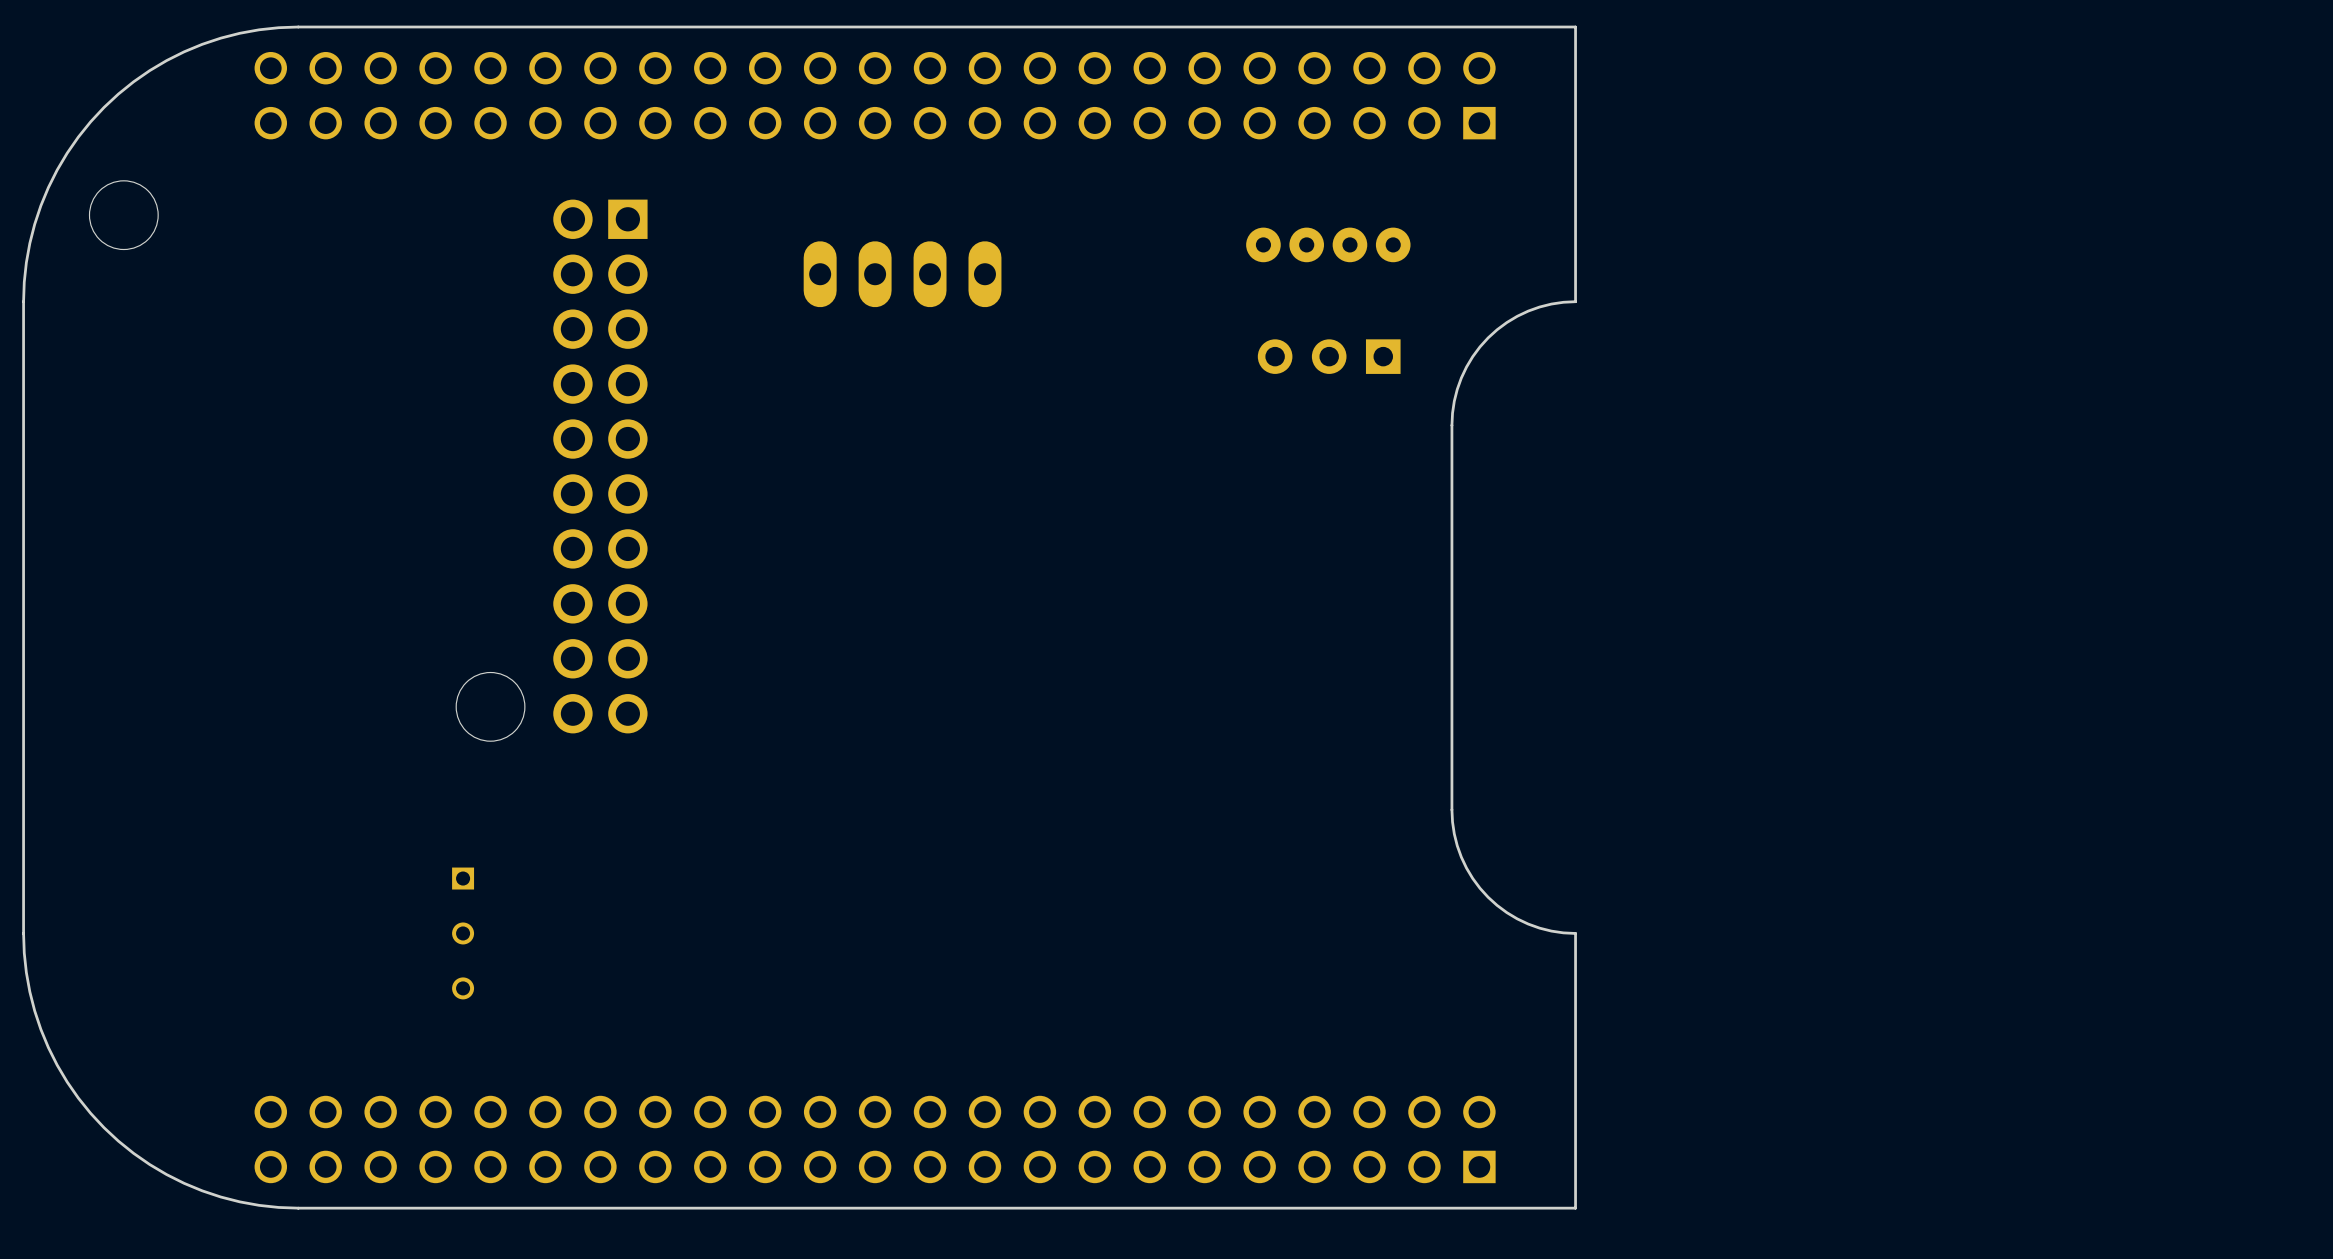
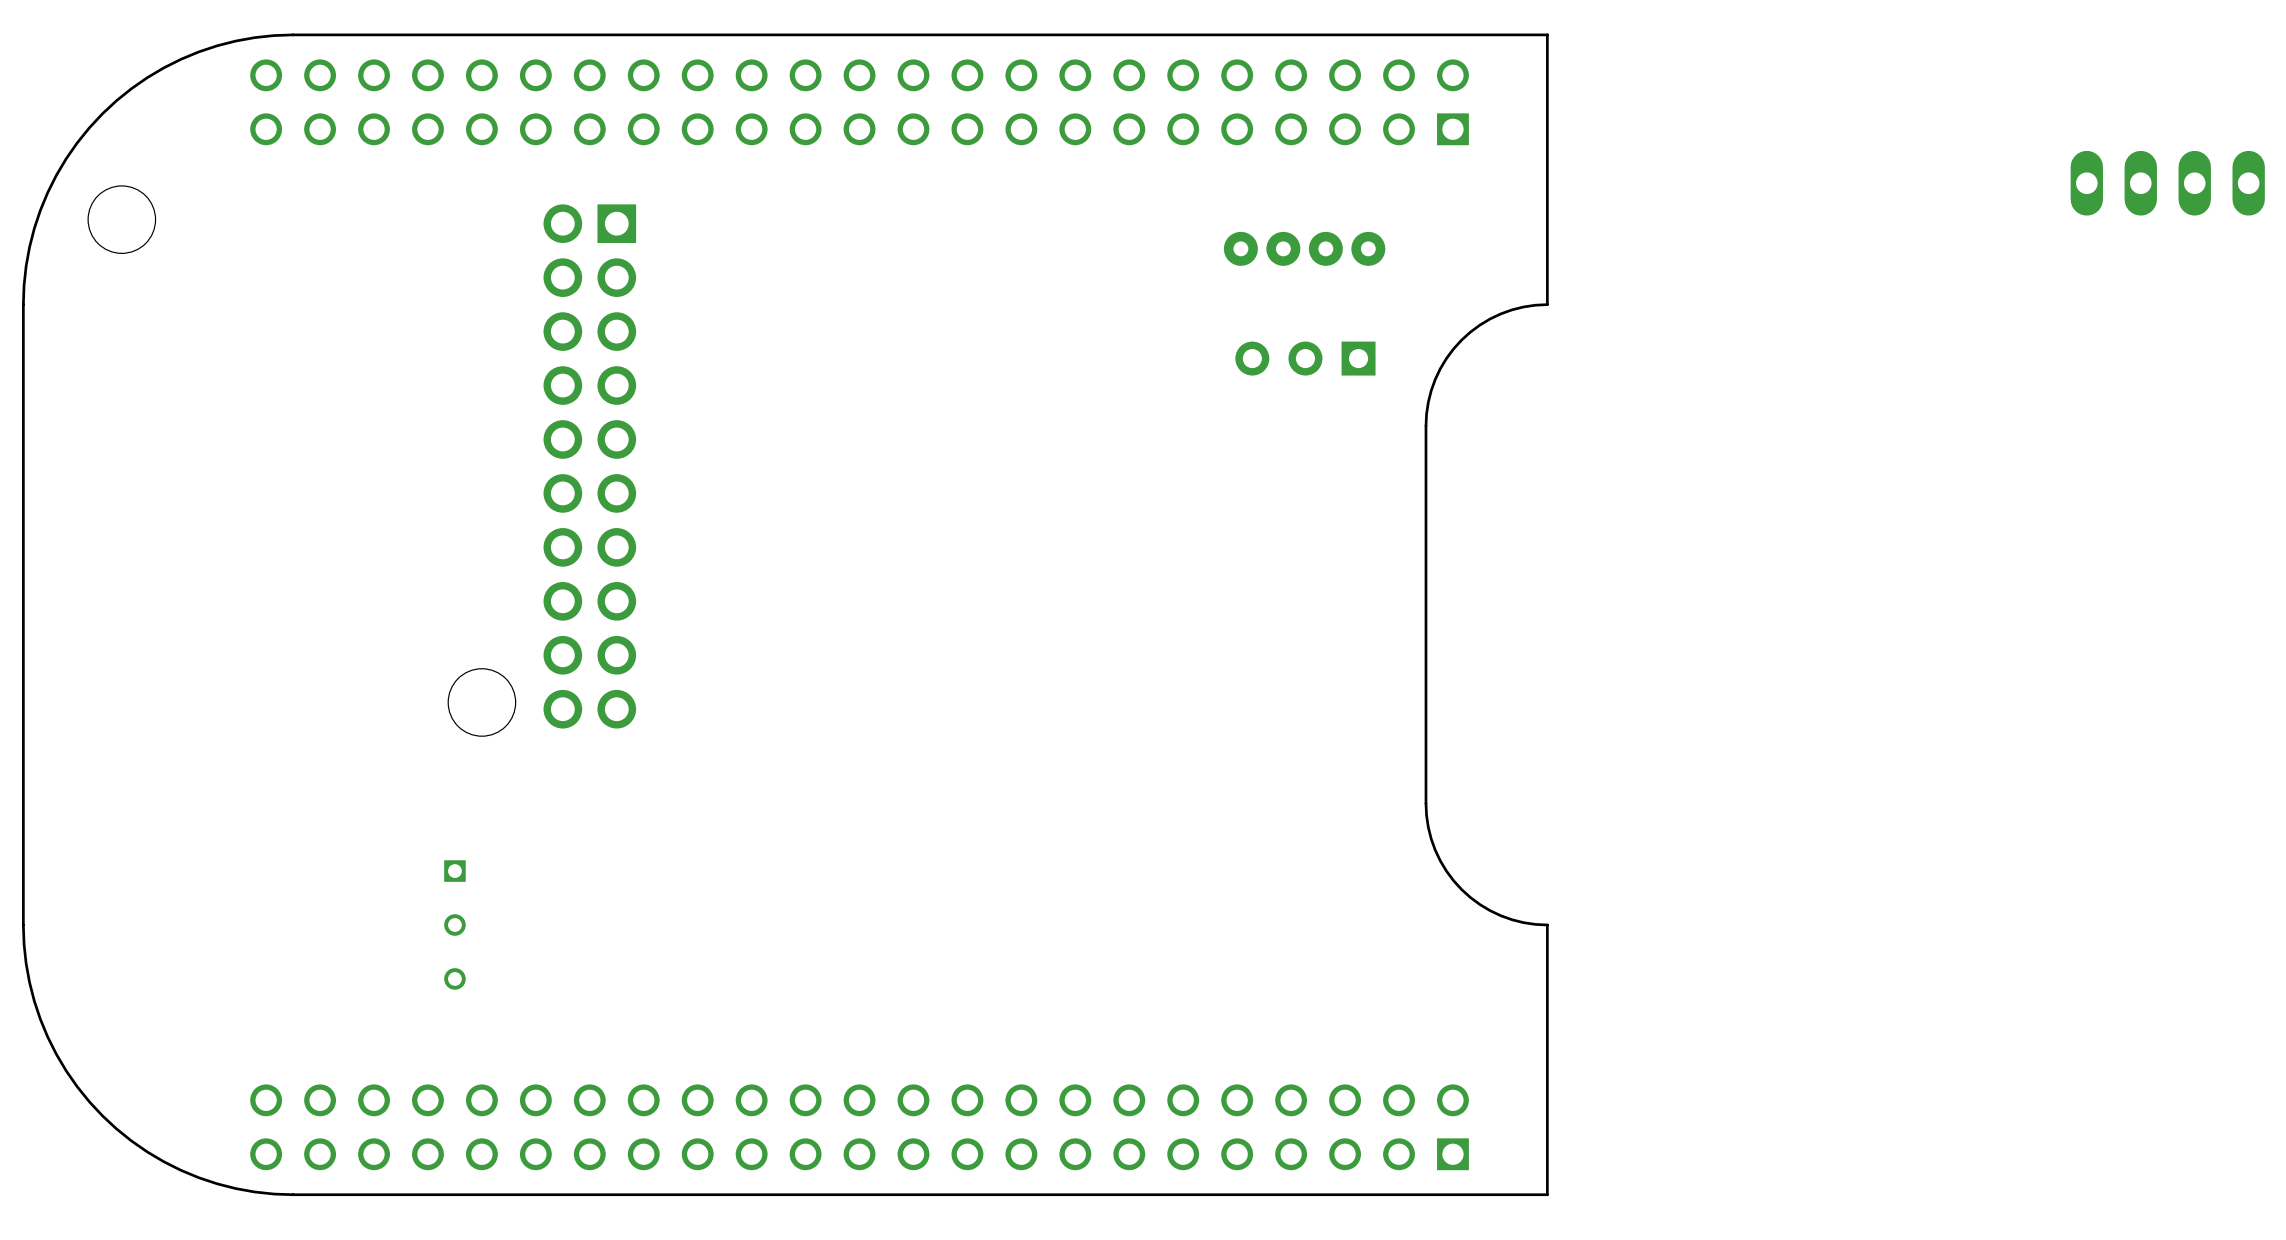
part: none -> (2167, 183)
part: (902, 274) -> none

